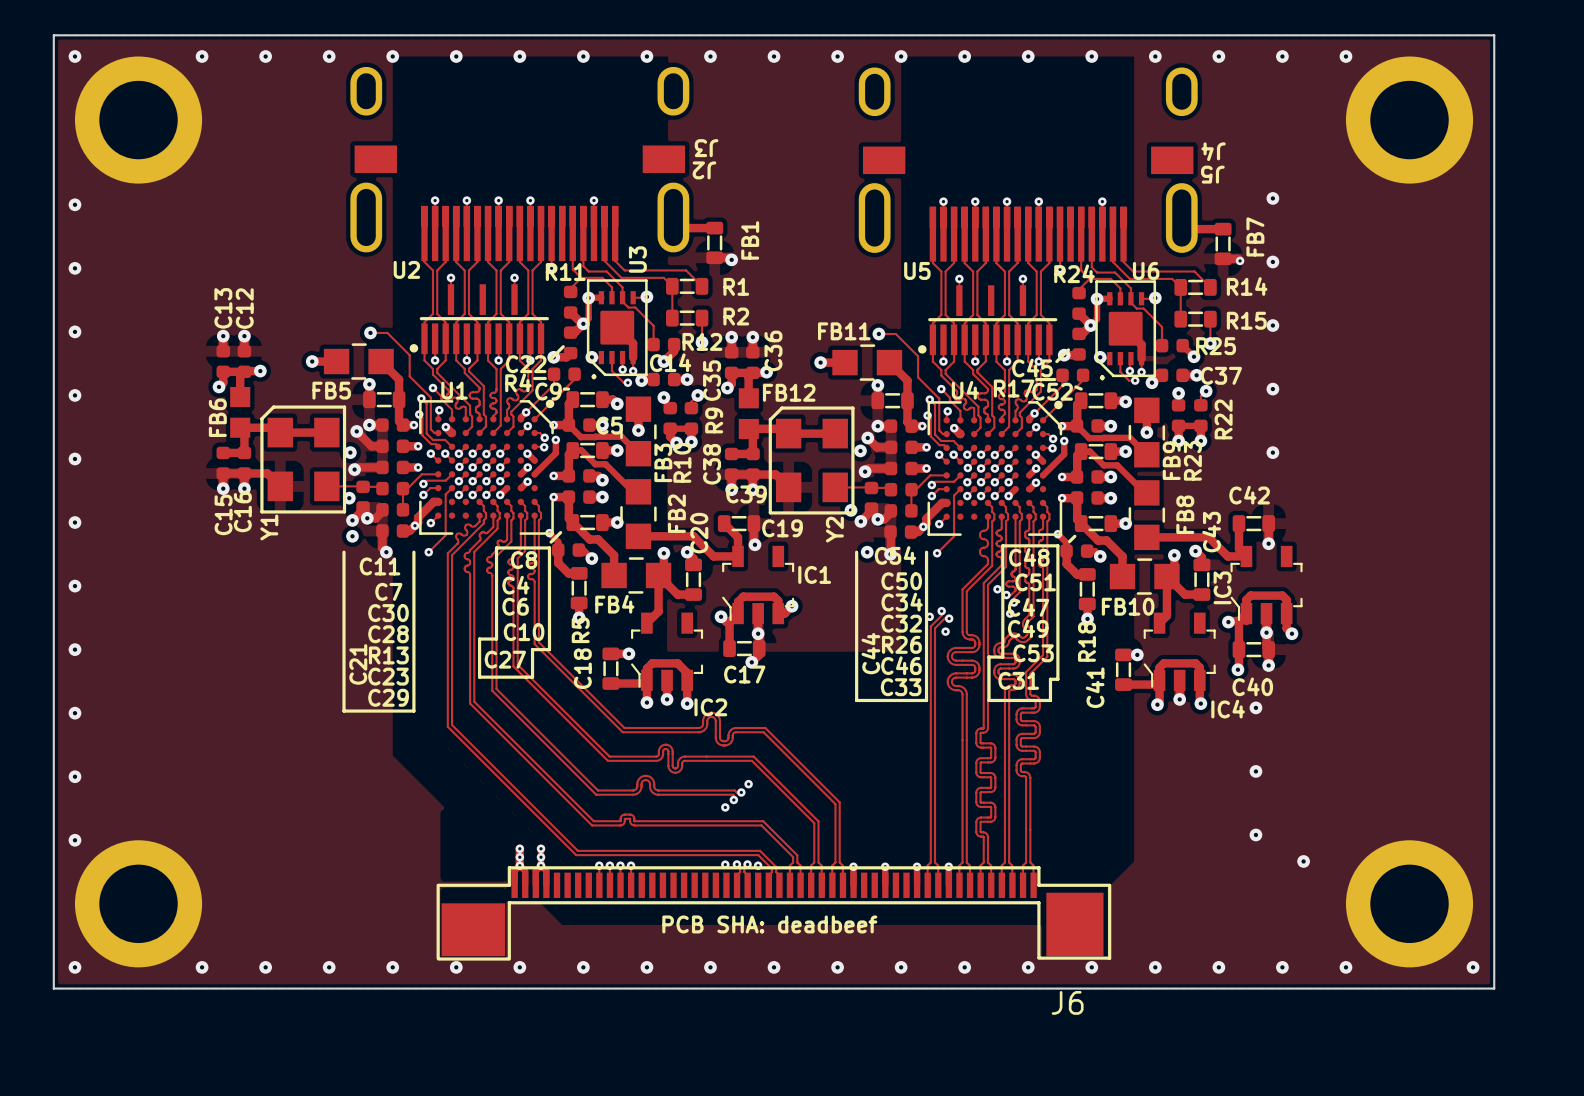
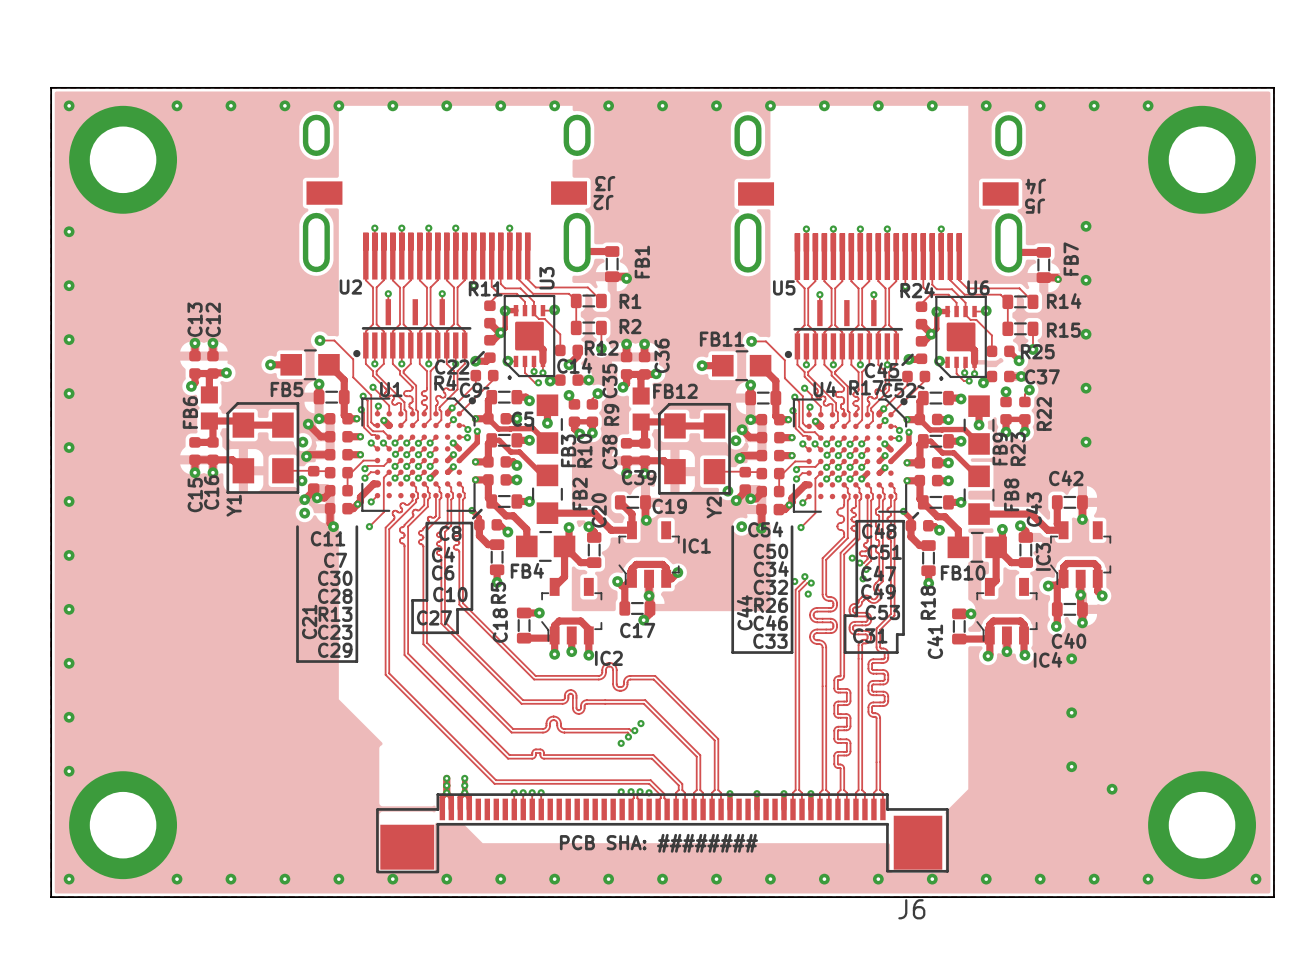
text: PCB SHA: deadbeef (769, 924) -> PCB SHA: ######## (658, 843)

